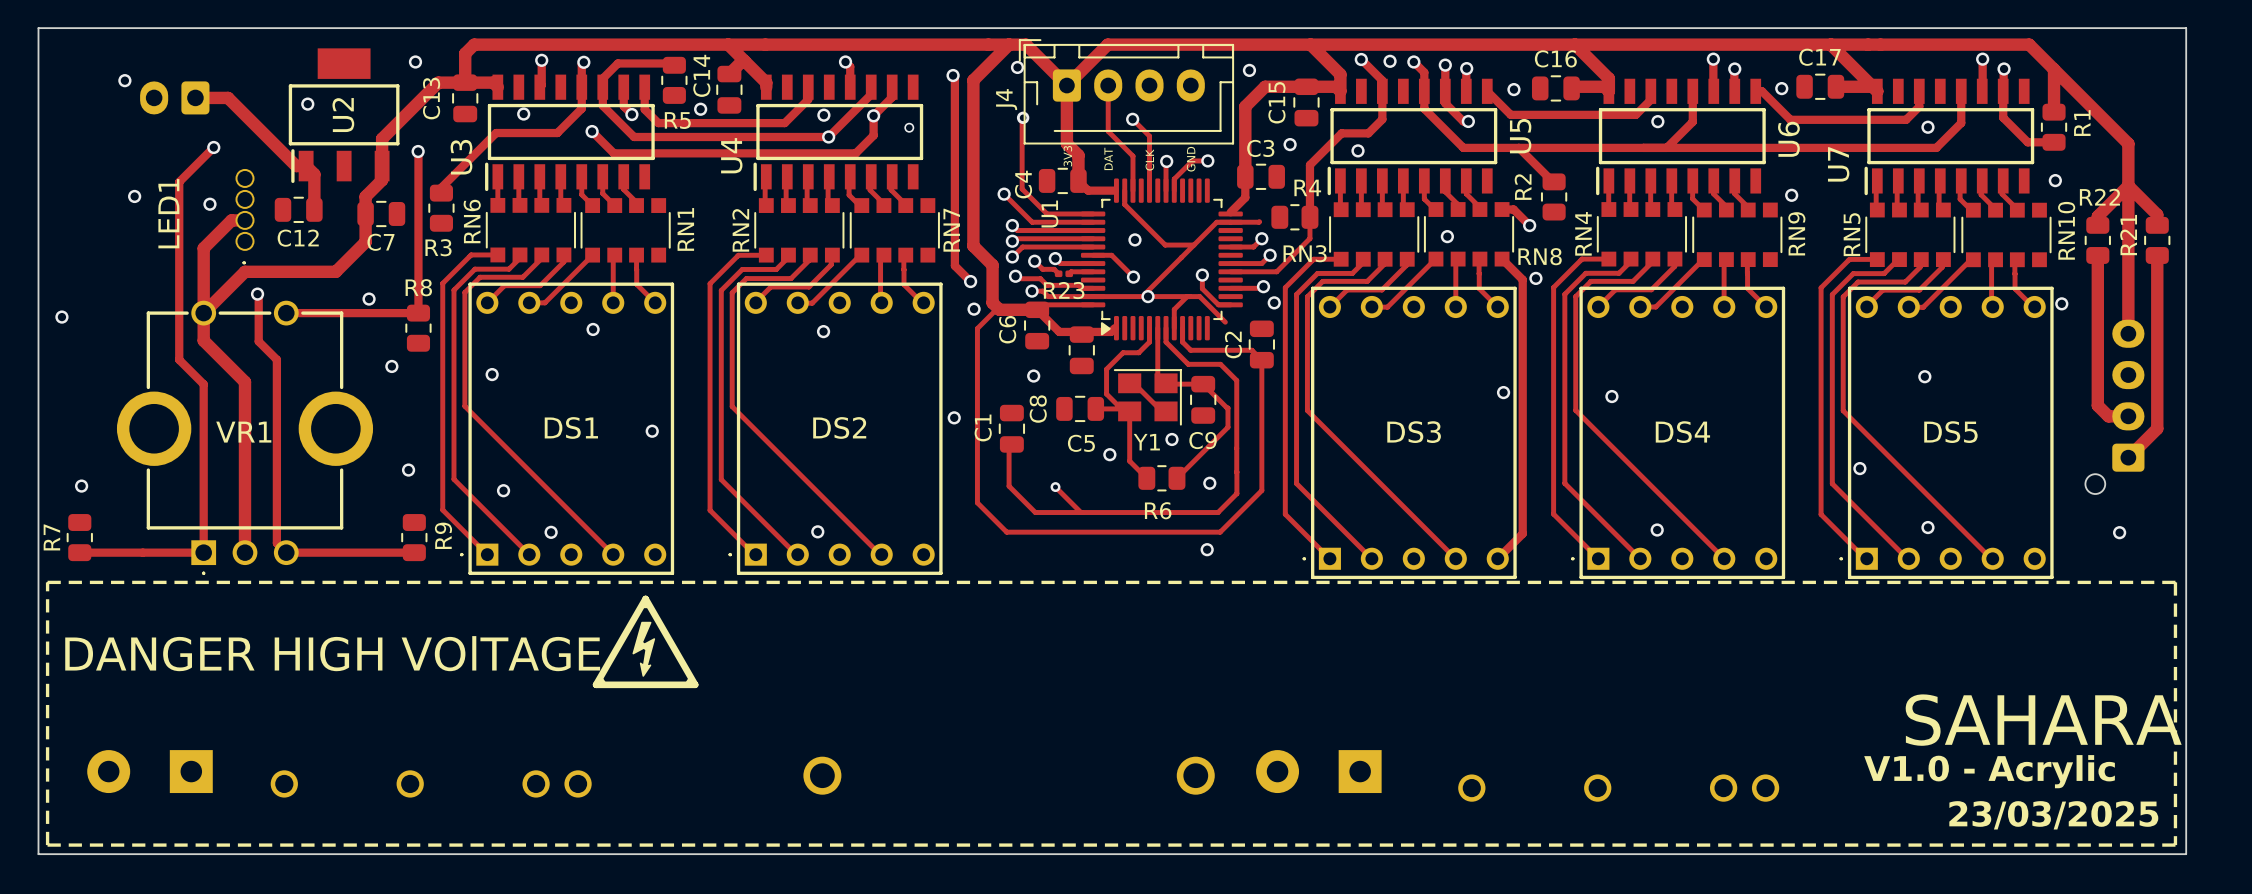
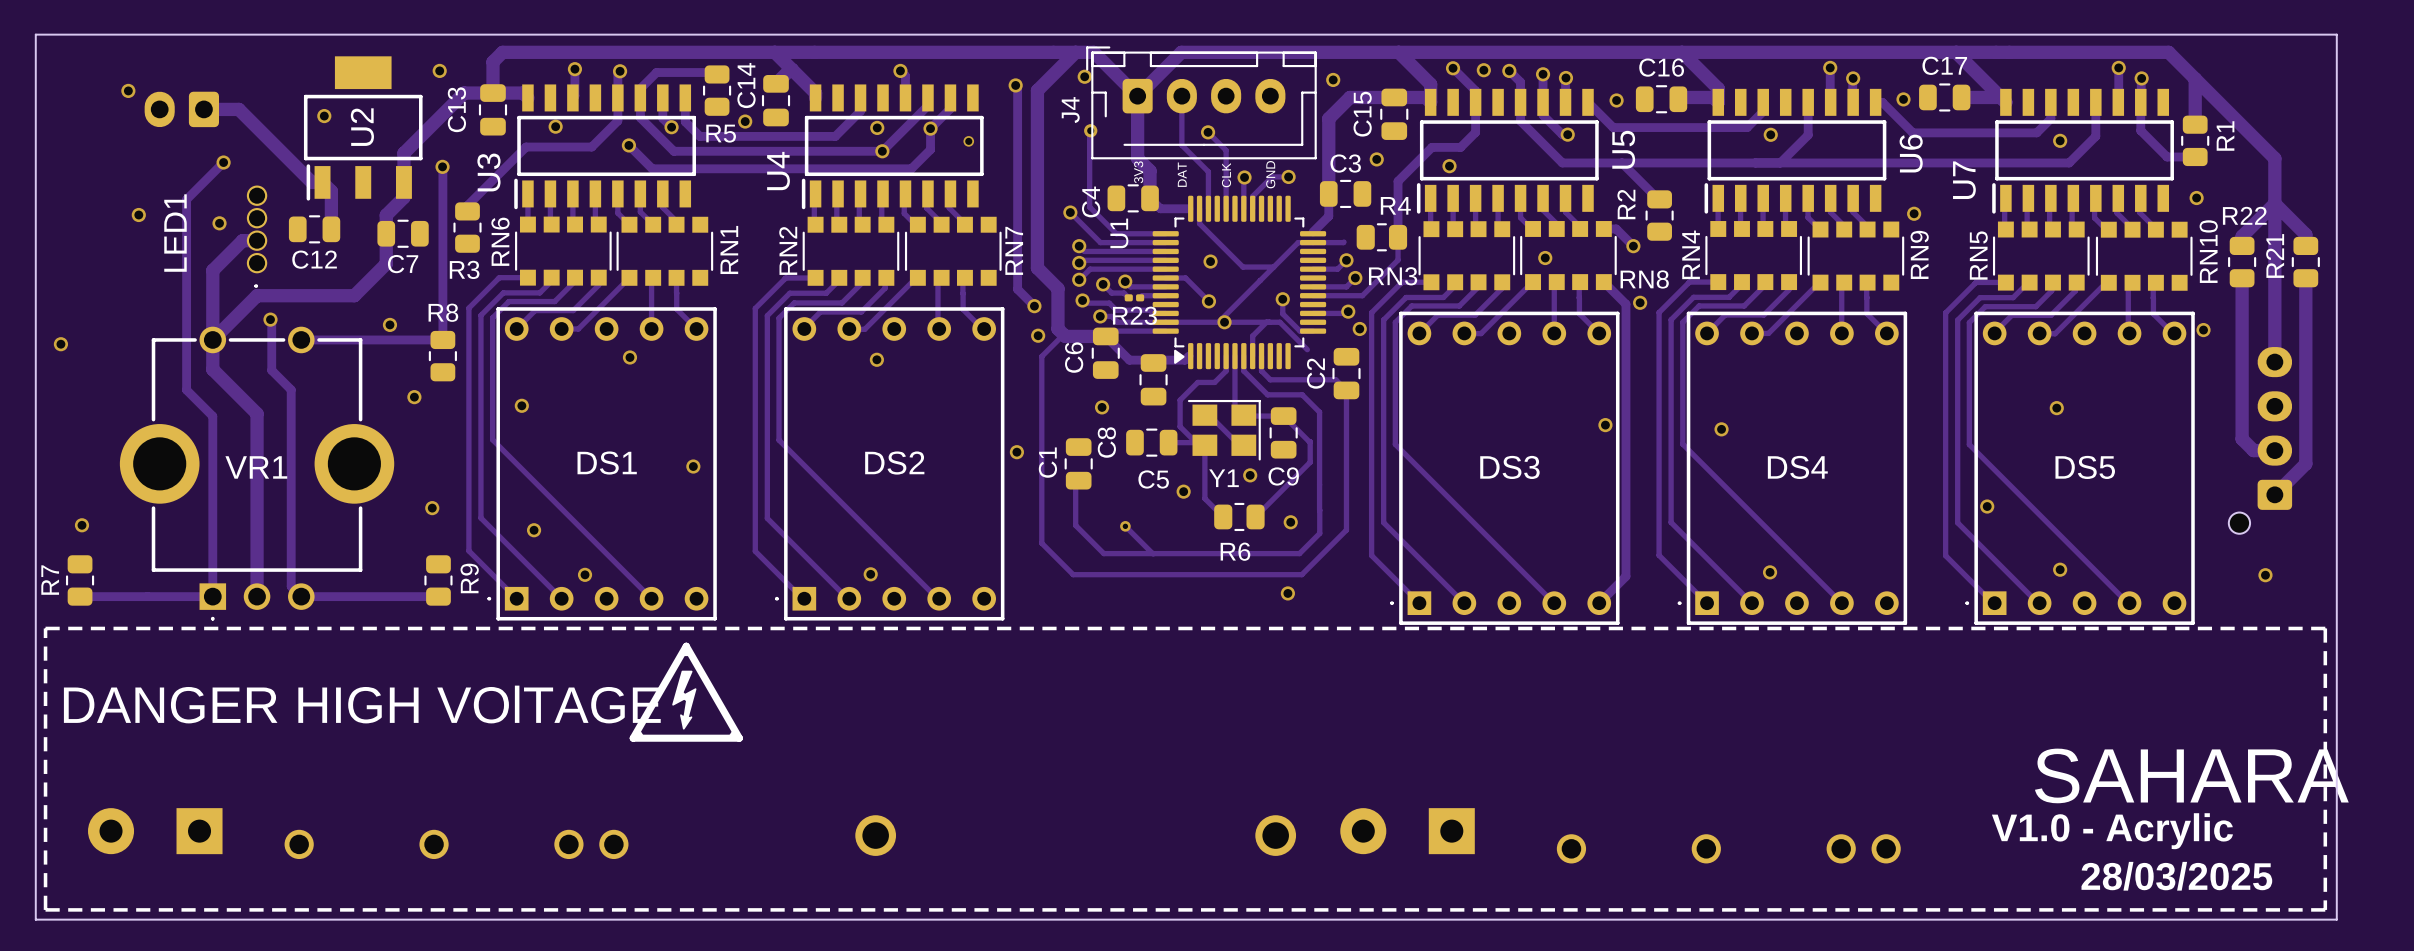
text: 23/03/2025 (2053, 815) -> 28/03/2025 (2176, 876)

